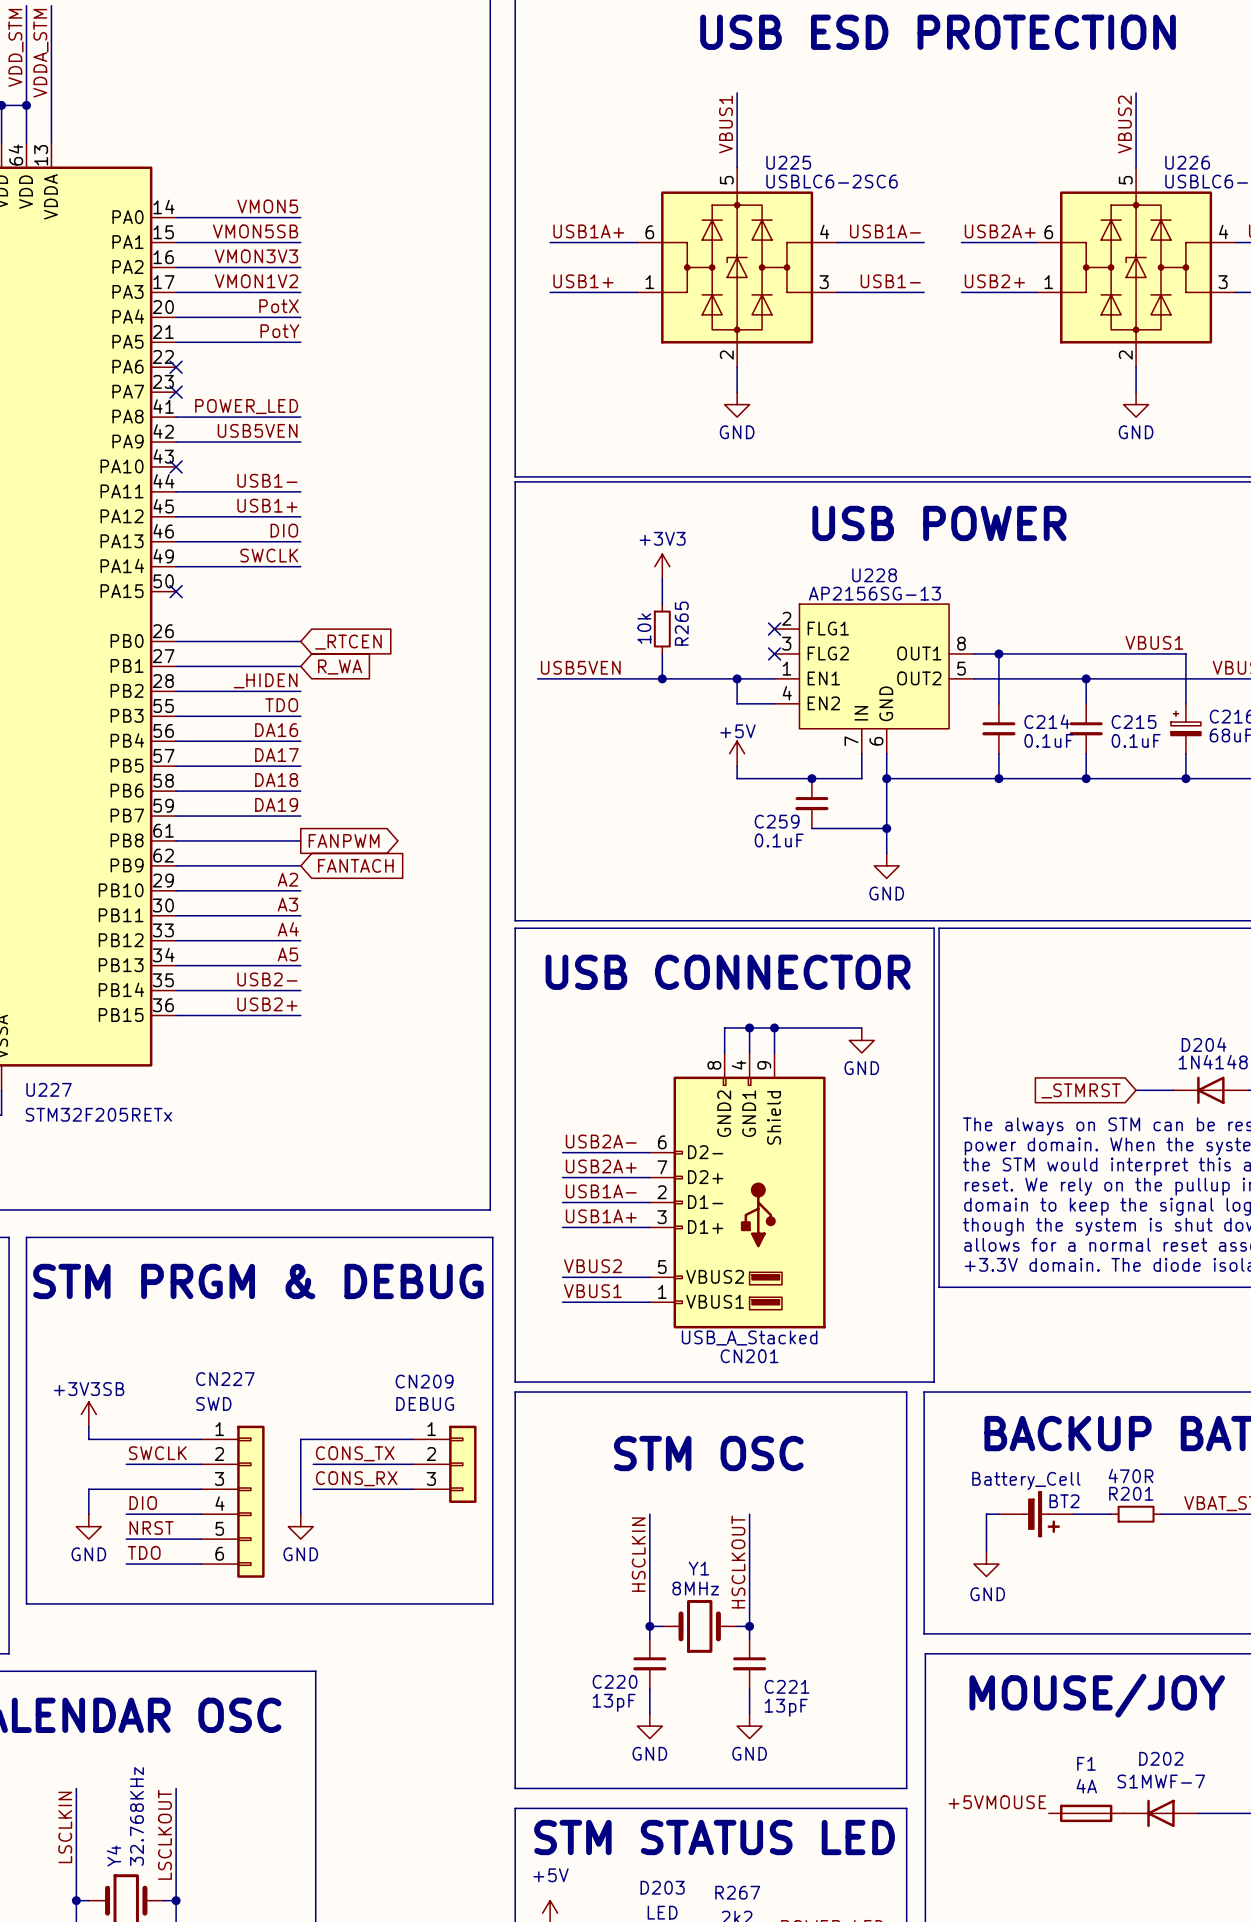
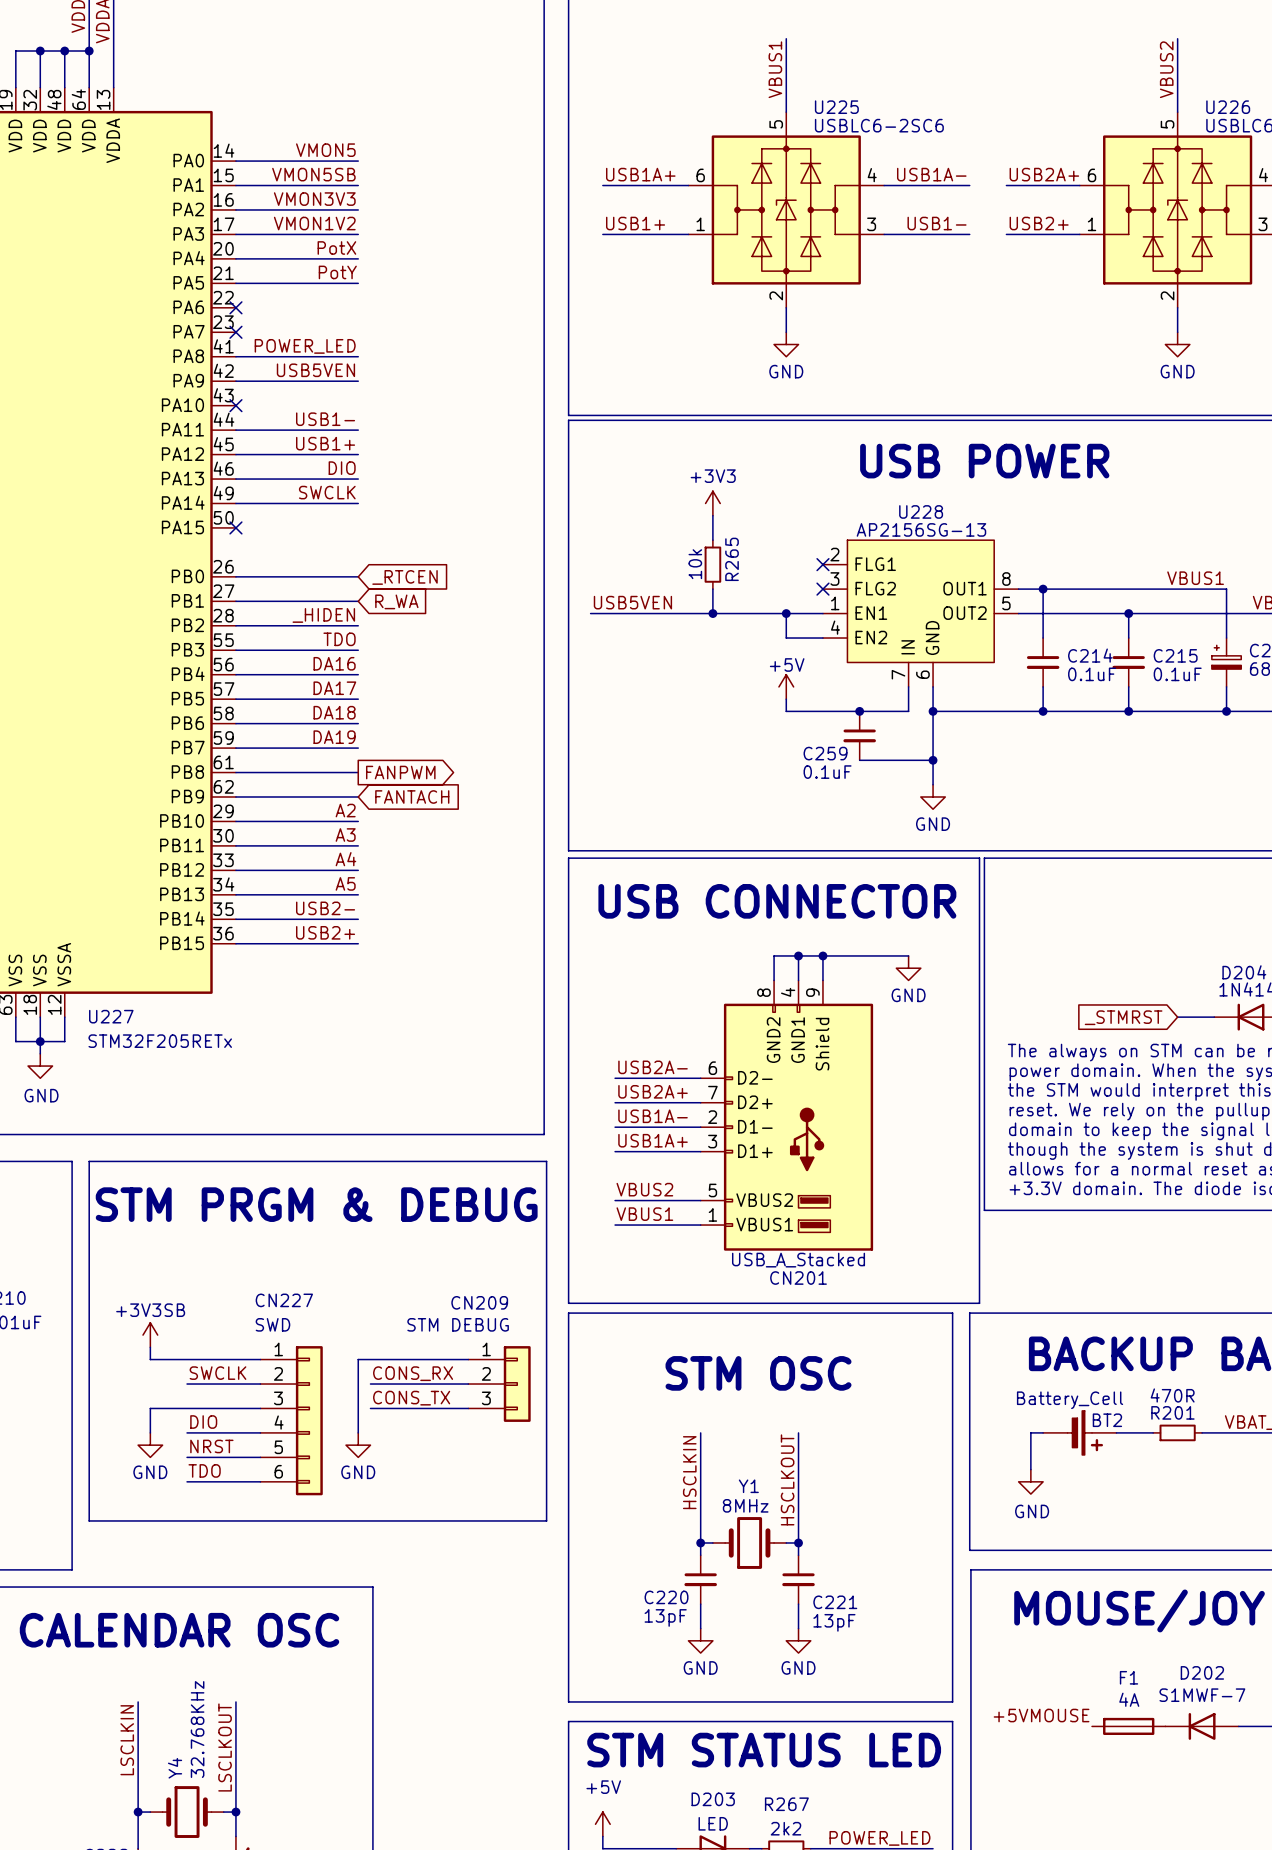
CN209 value: DEBUG (425, 1404) -> STM DEBUG (458, 1324)
label: CONS_TX (355, 1453) -> CONS_RX (413, 1373)
label: CONS_RX (356, 1478) -> CONS_TX (411, 1398)

